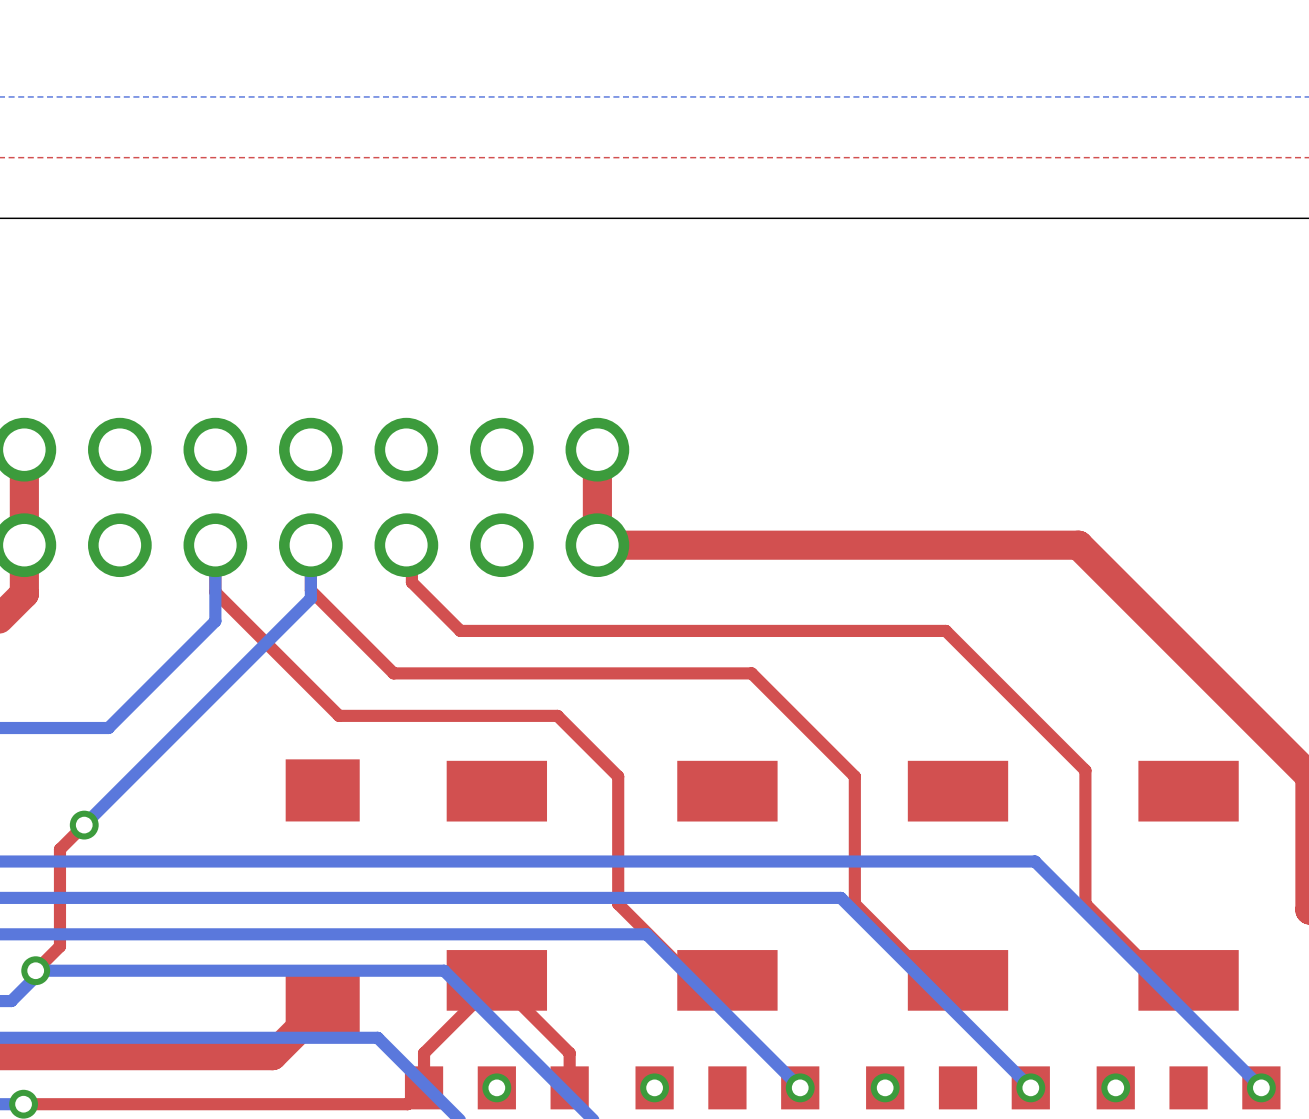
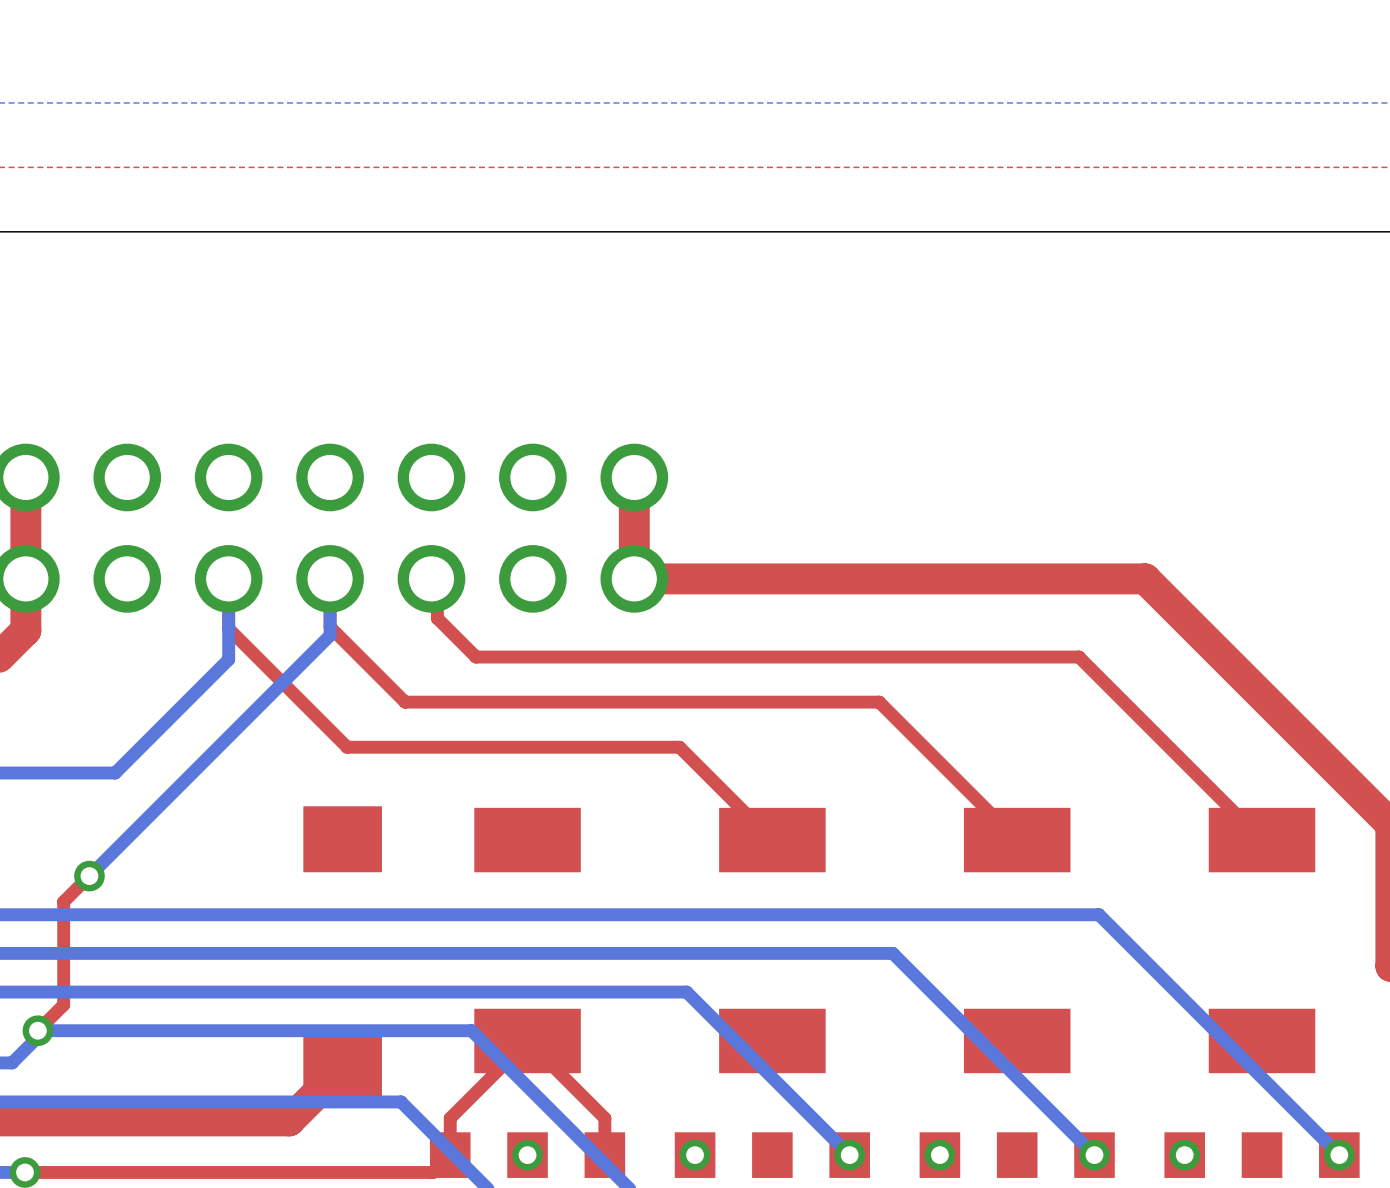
top track: (448, 618) (460, 630) (945, 630) (1085, 770) (1085, 903) (1161, 980) (1188, 980) -> (476, 657) (1078, 657) (1262, 840)
top track: (381, 661) (393, 673) (751, 673) (854, 776) (854, 903) (931, 980) (957, 980) -> (405, 702) (879, 702) (1017, 840)
top track: (326, 703) (339, 715) (557, 715) (618, 776) (618, 903) (694, 980) (727, 980) -> (347, 747) (679, 747) (772, 840)

